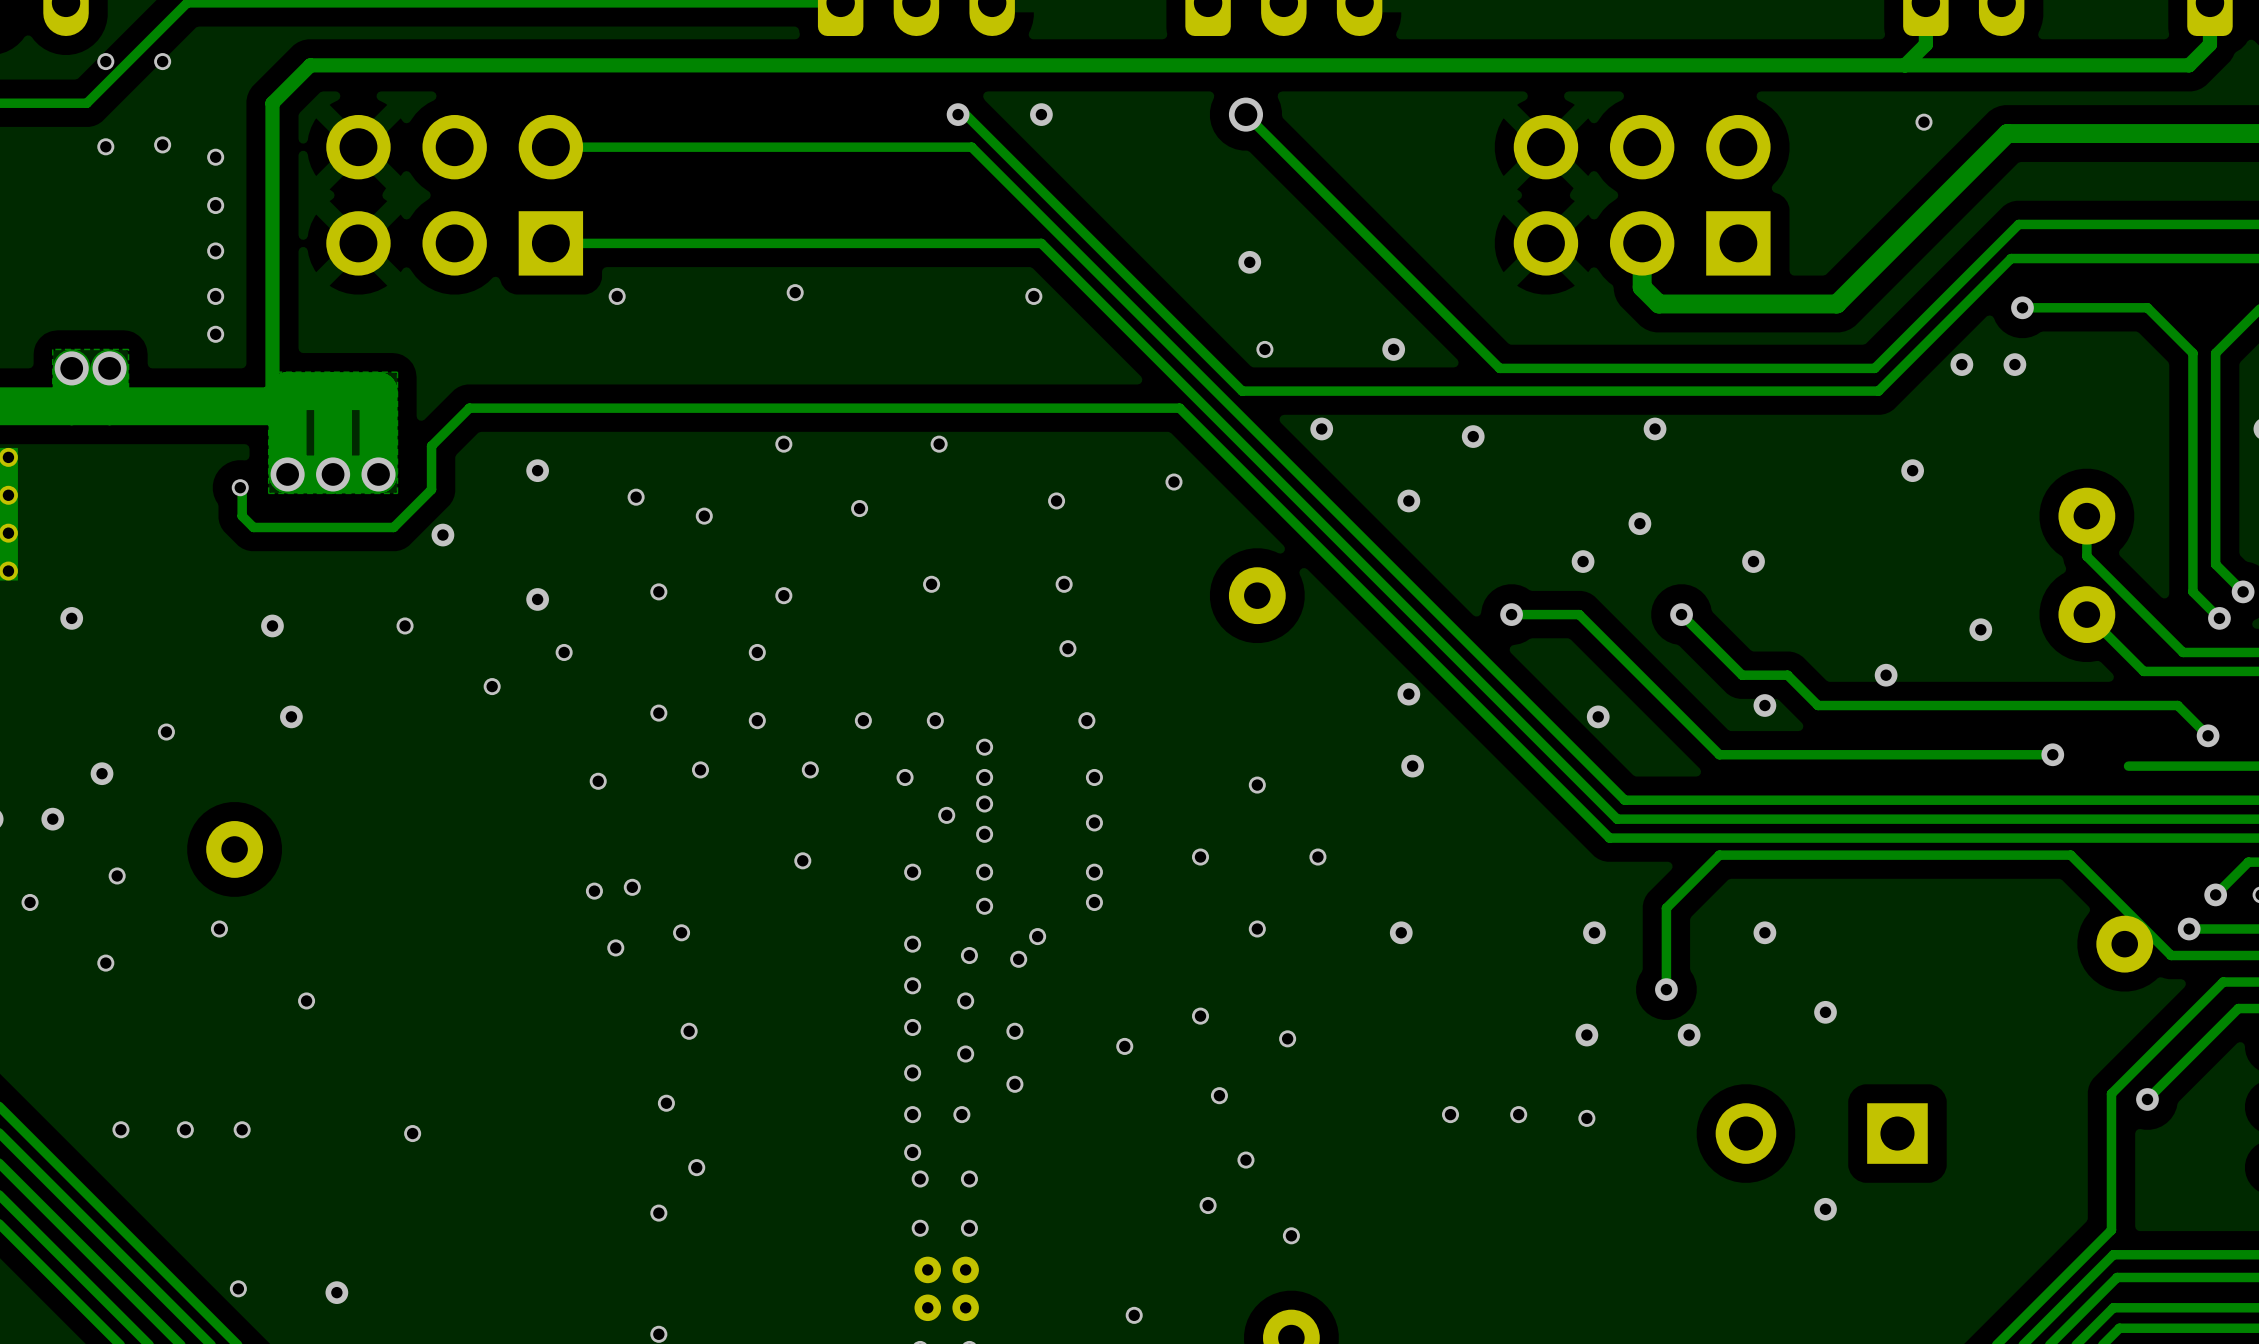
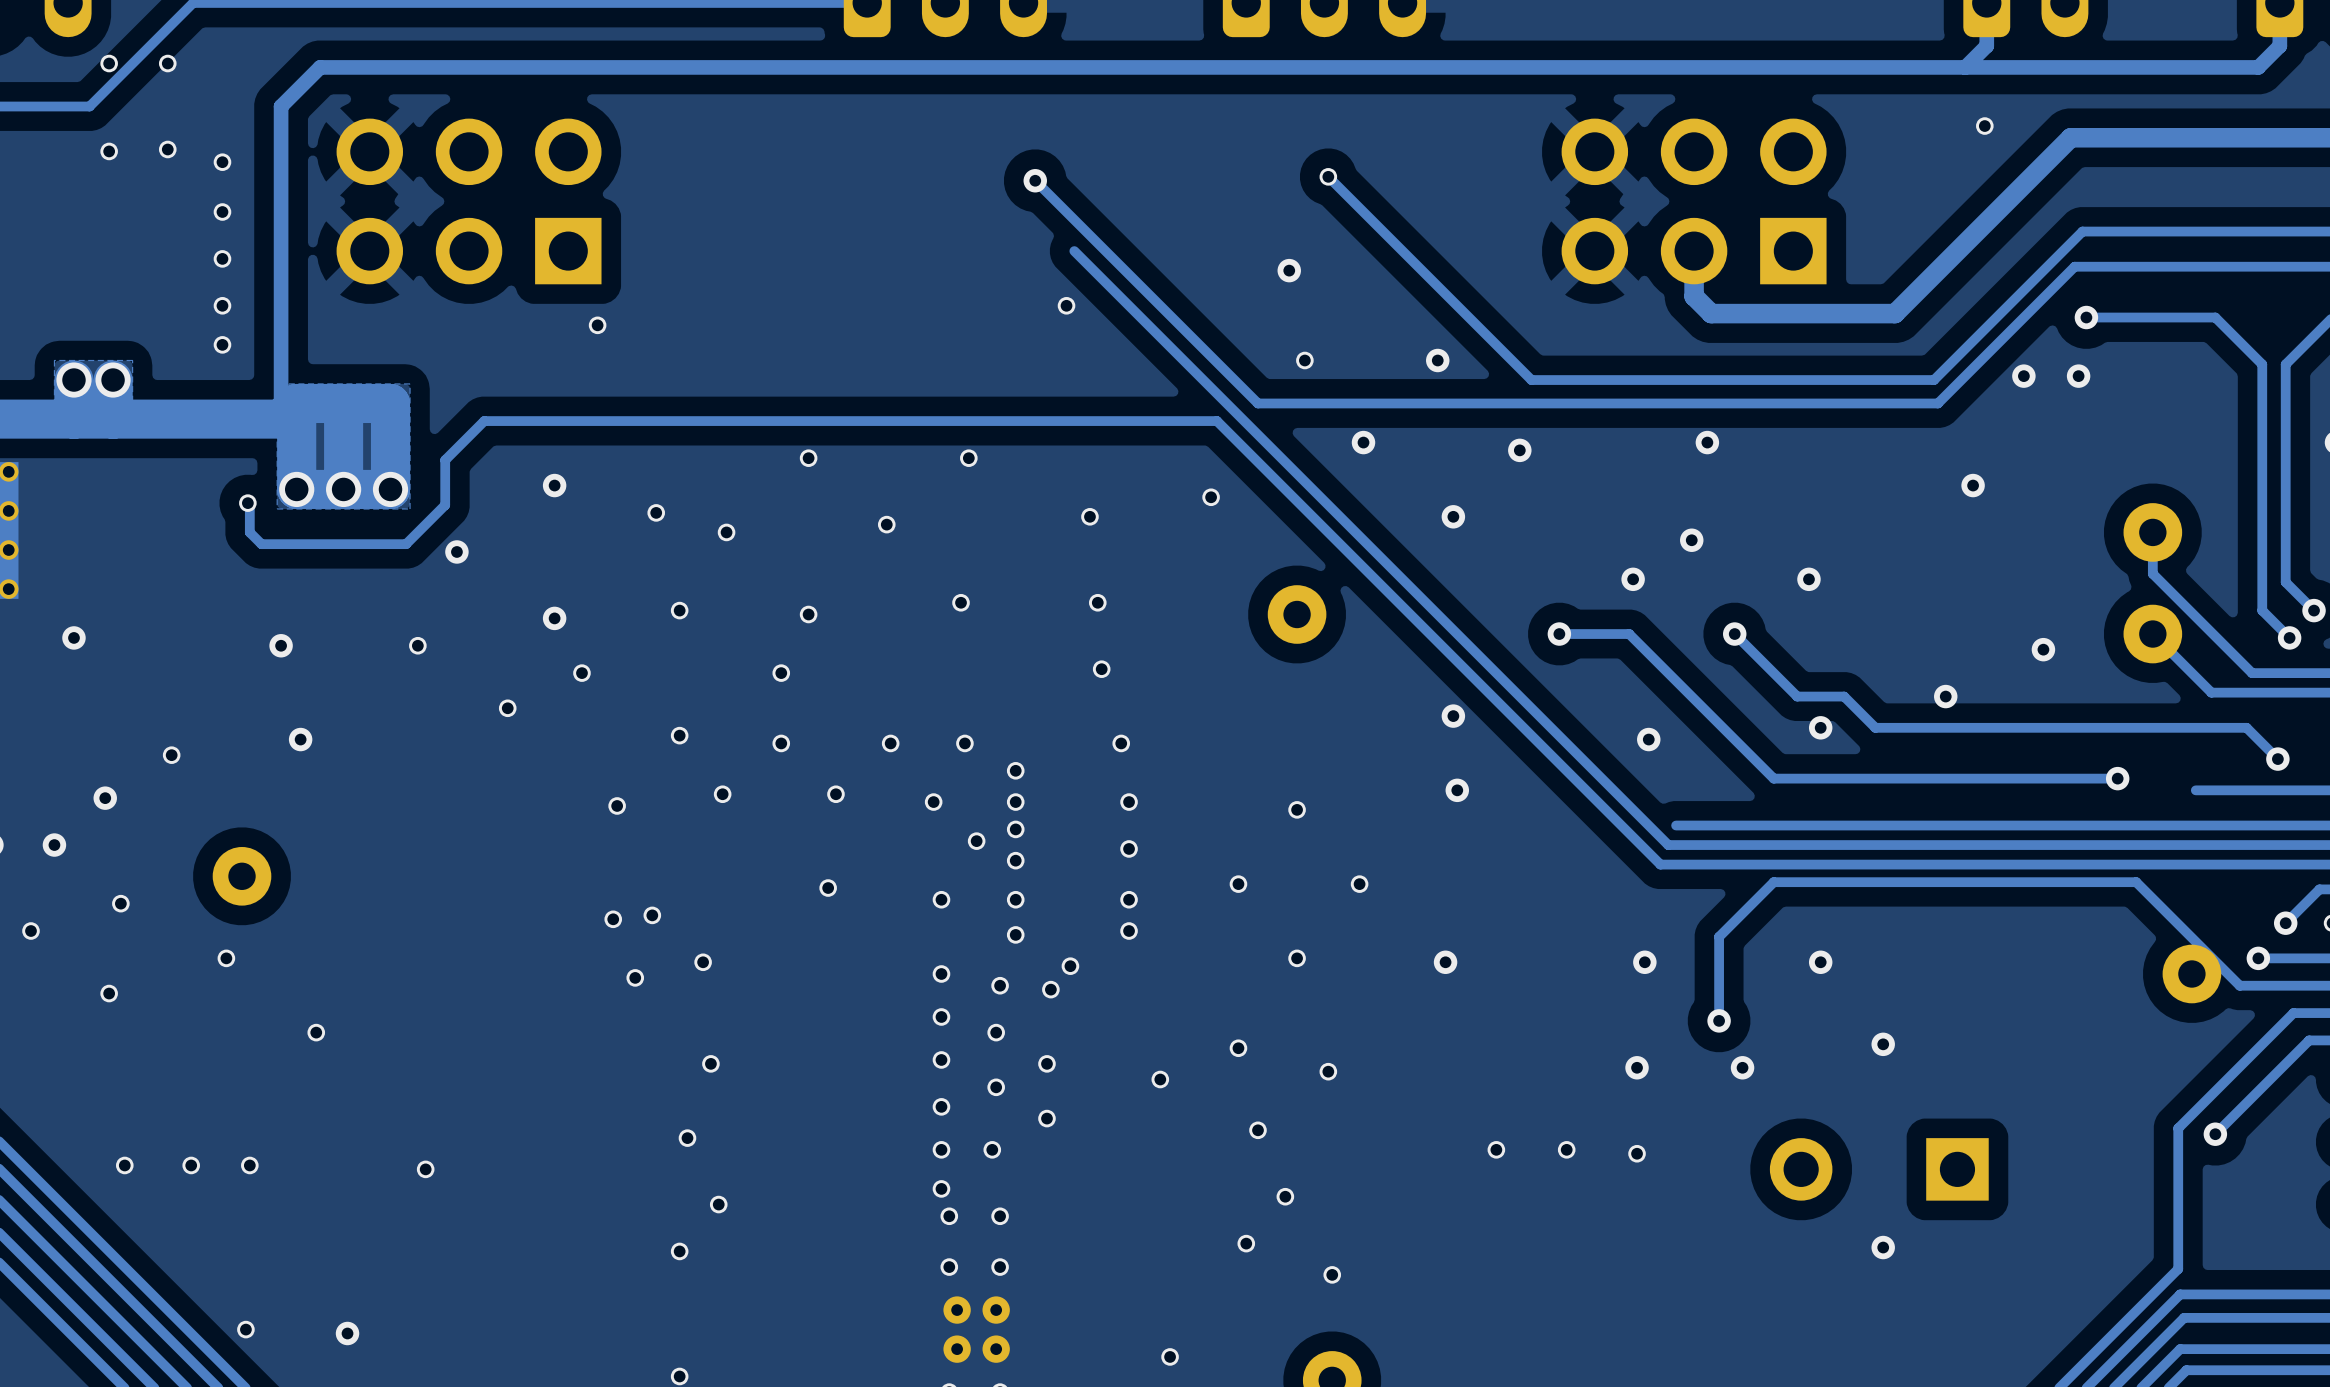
track: (958, 114) (965, 114) (1242, 391) -> (1035, 180) (1257, 403) (1281, 403)
via: (958, 114) -> none
via: (1041, 114) -> none
track: (1245, 114) (1499, 368) -> (1328, 176) (1531, 380) (1547, 380)
via: (1245, 114) -> none
track: (550, 147) (971, 147) (1624, 800) -> none
via: none -> (1328, 176)
via: none -> (1035, 180)
track: (1041, 243) (550, 243) -> none
via: (795, 292) -> none
via position: (617, 296) -> (597, 325)

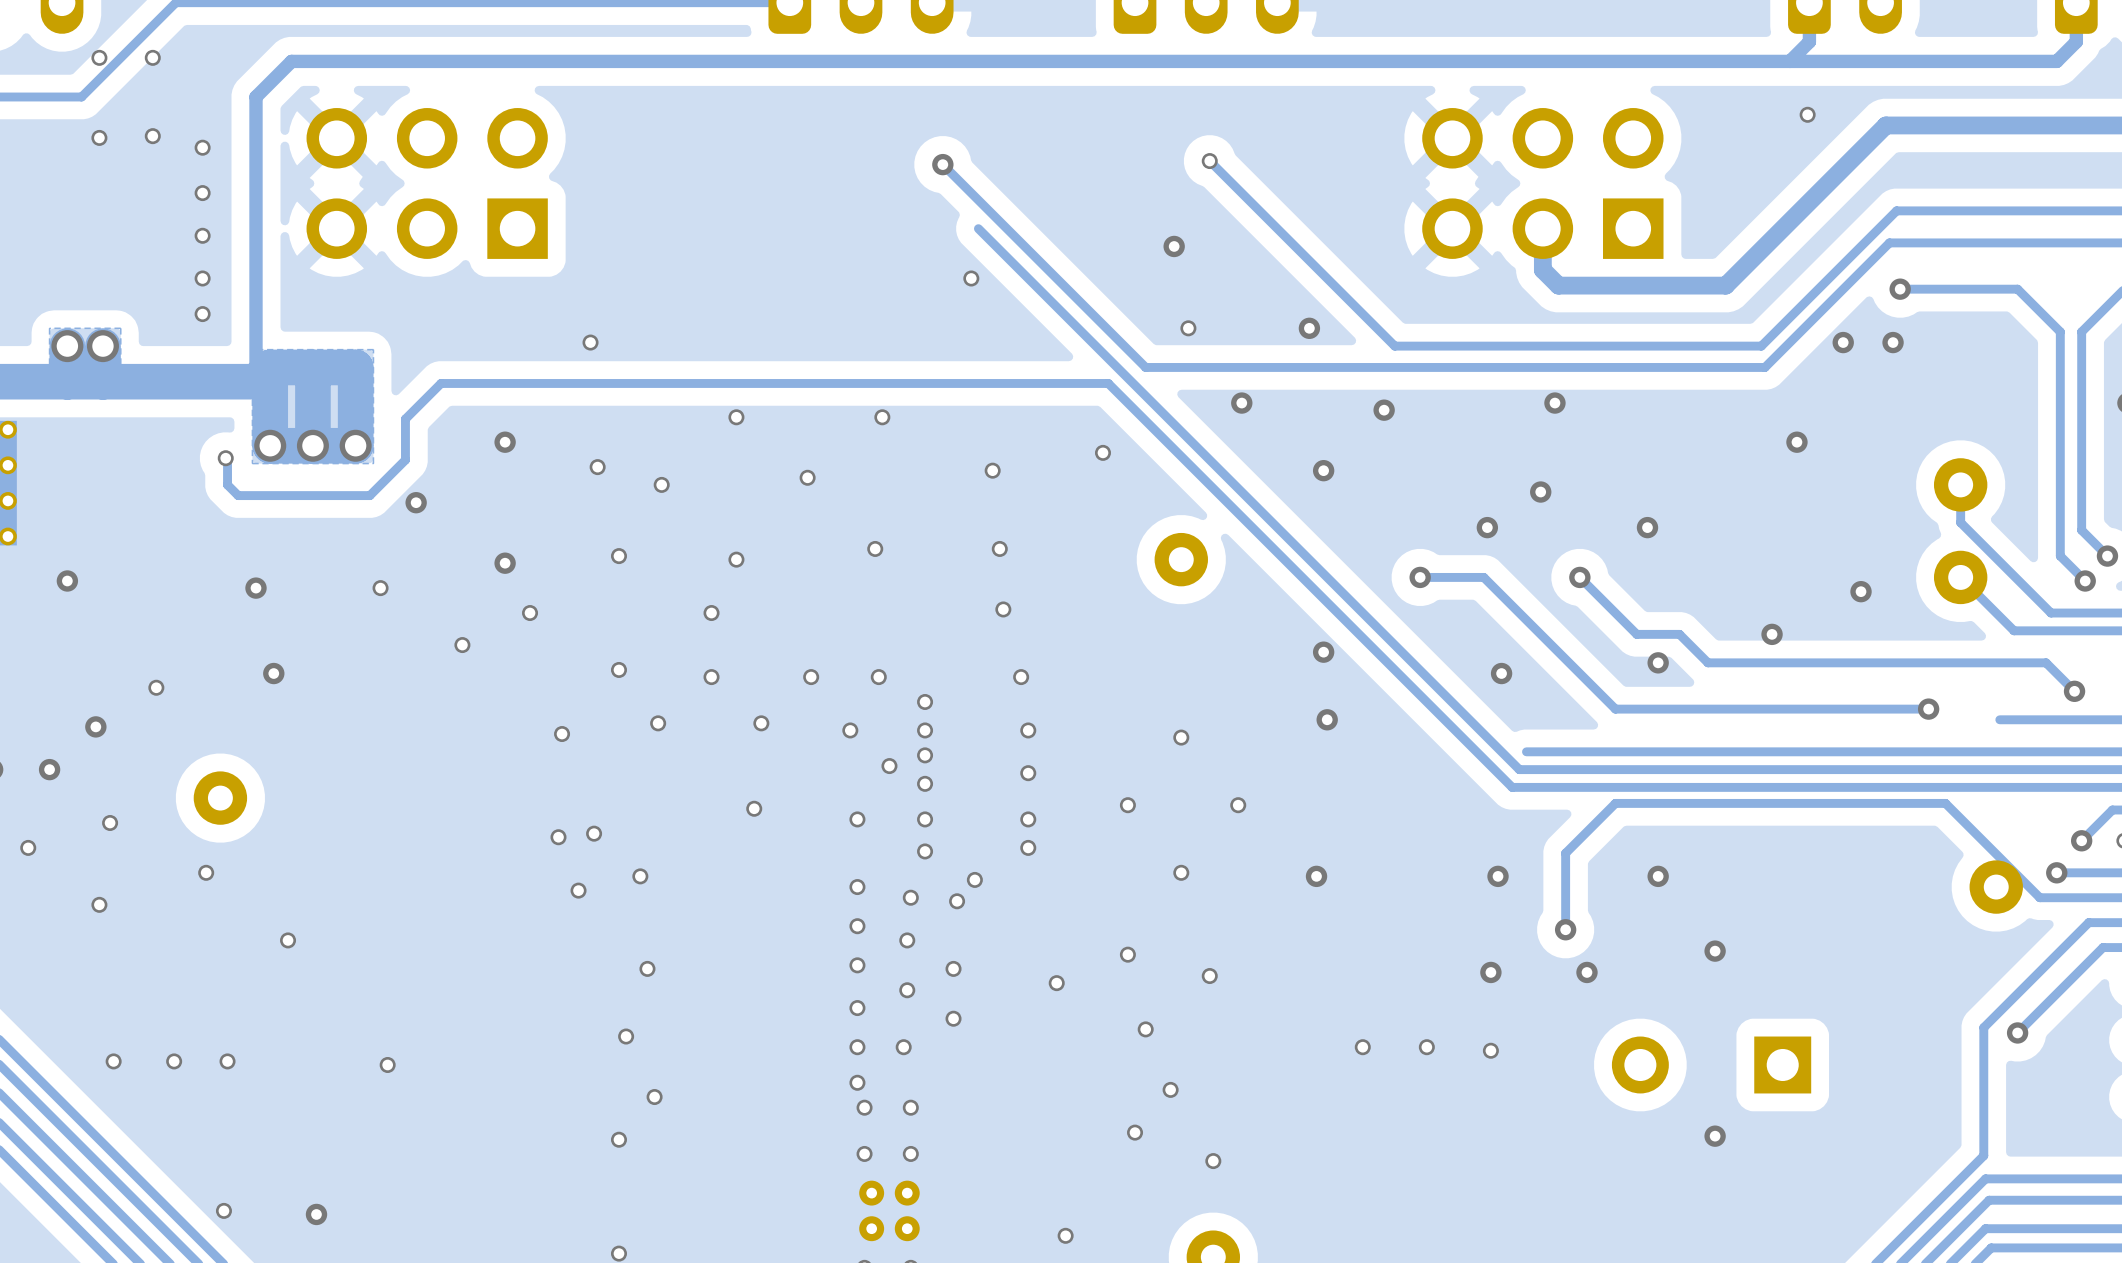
via position: (597, 325) -> (590, 342)

